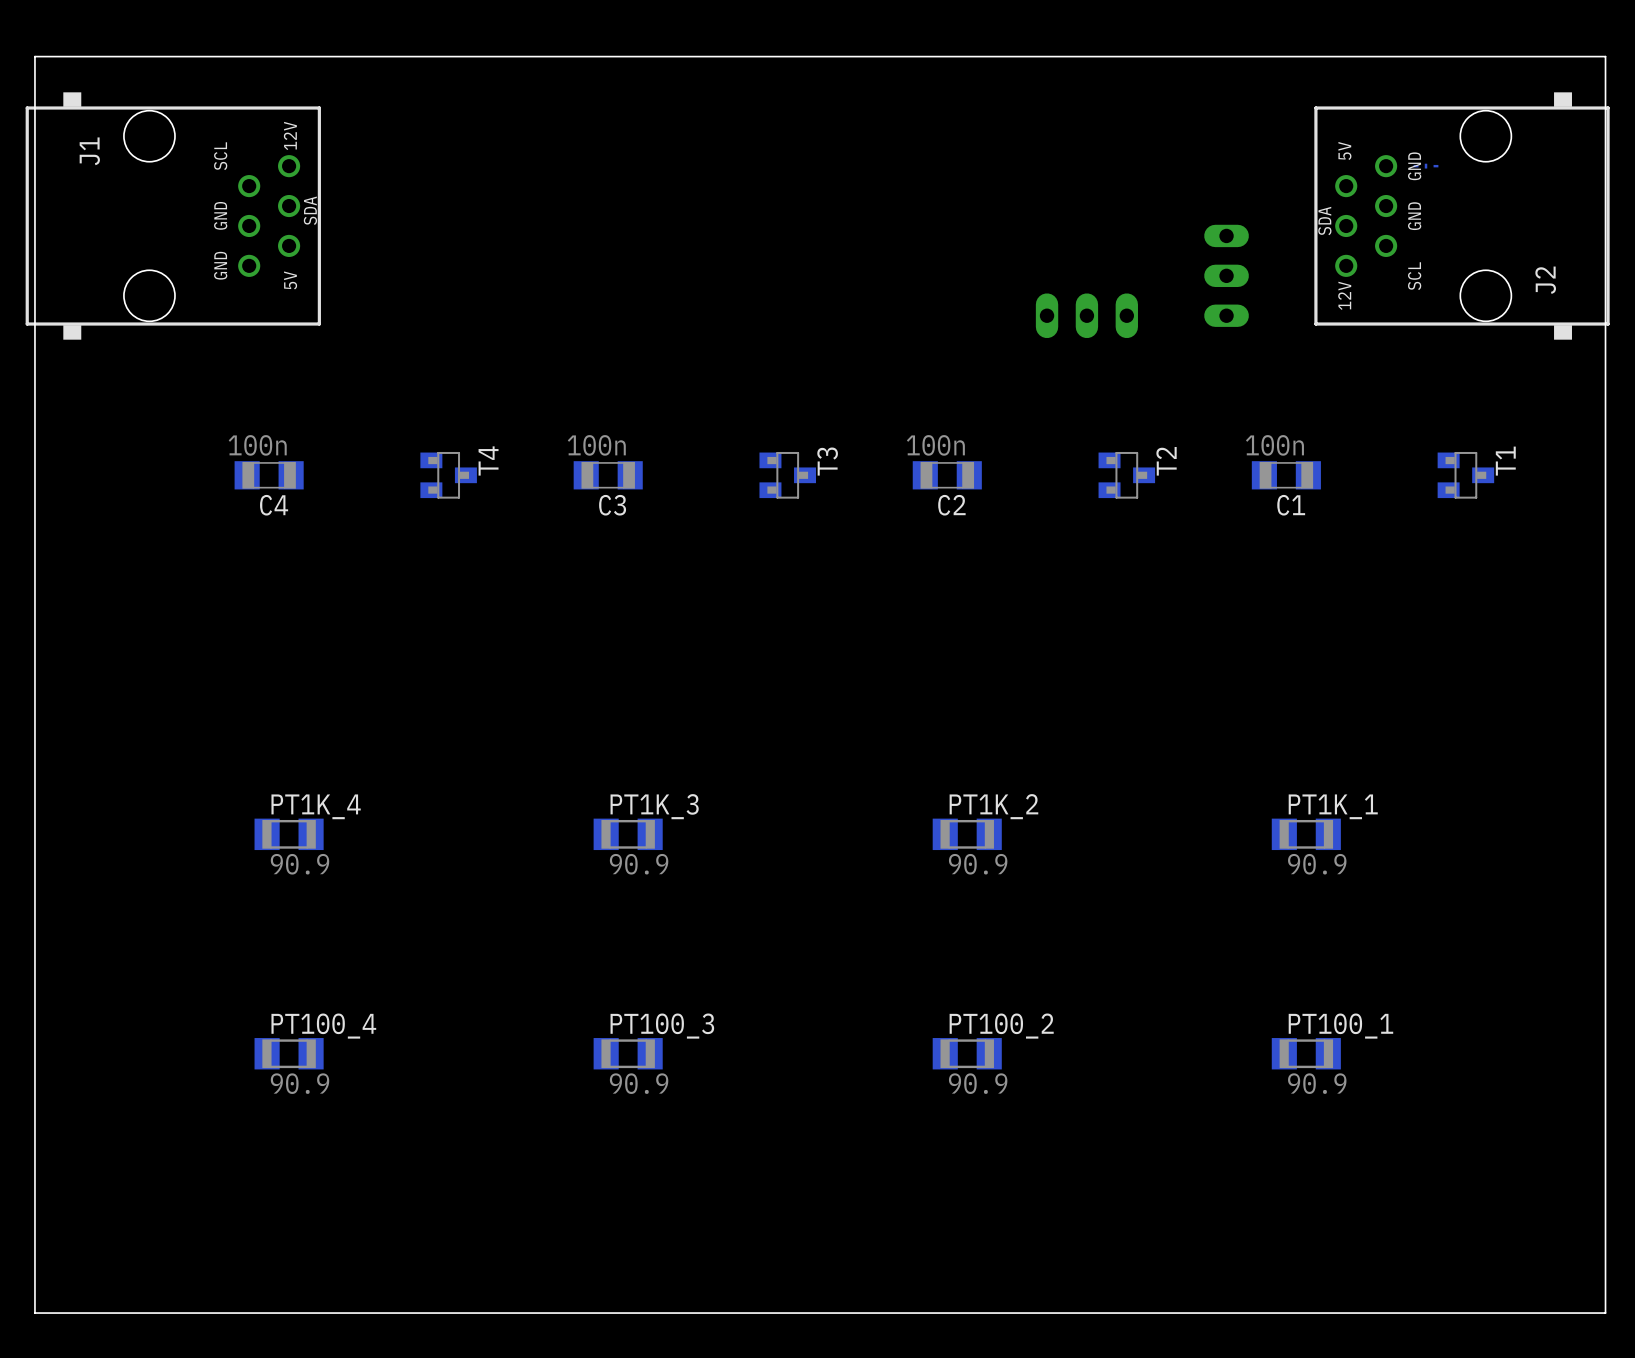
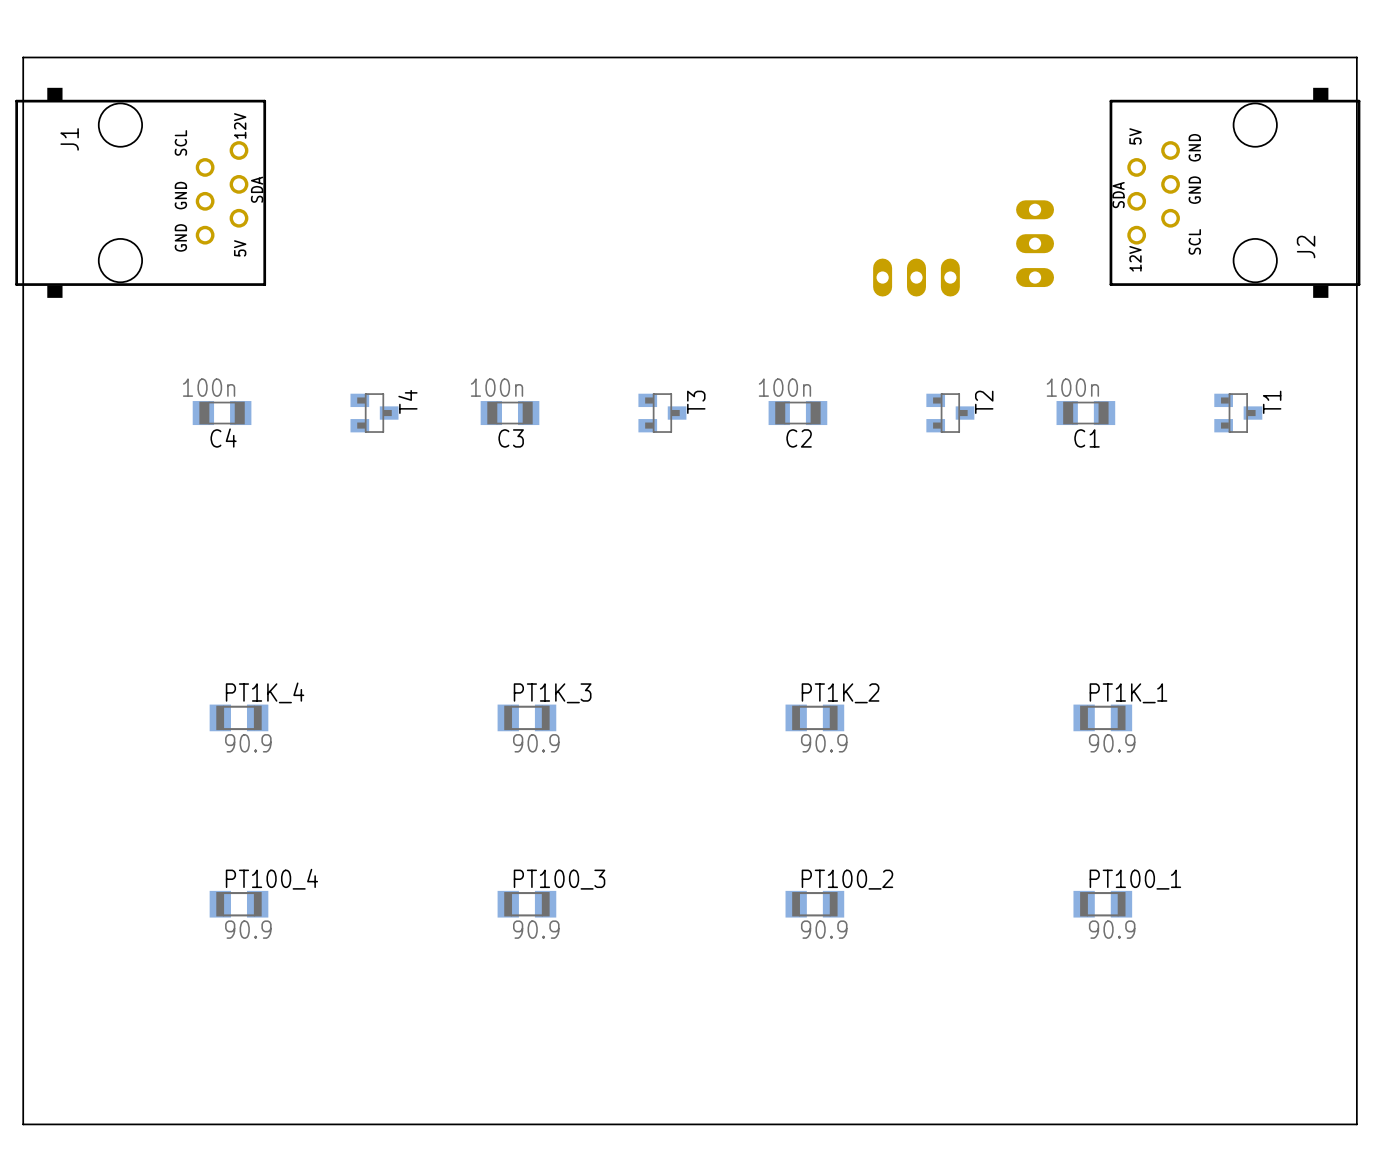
part: (1426, 166) -> none

